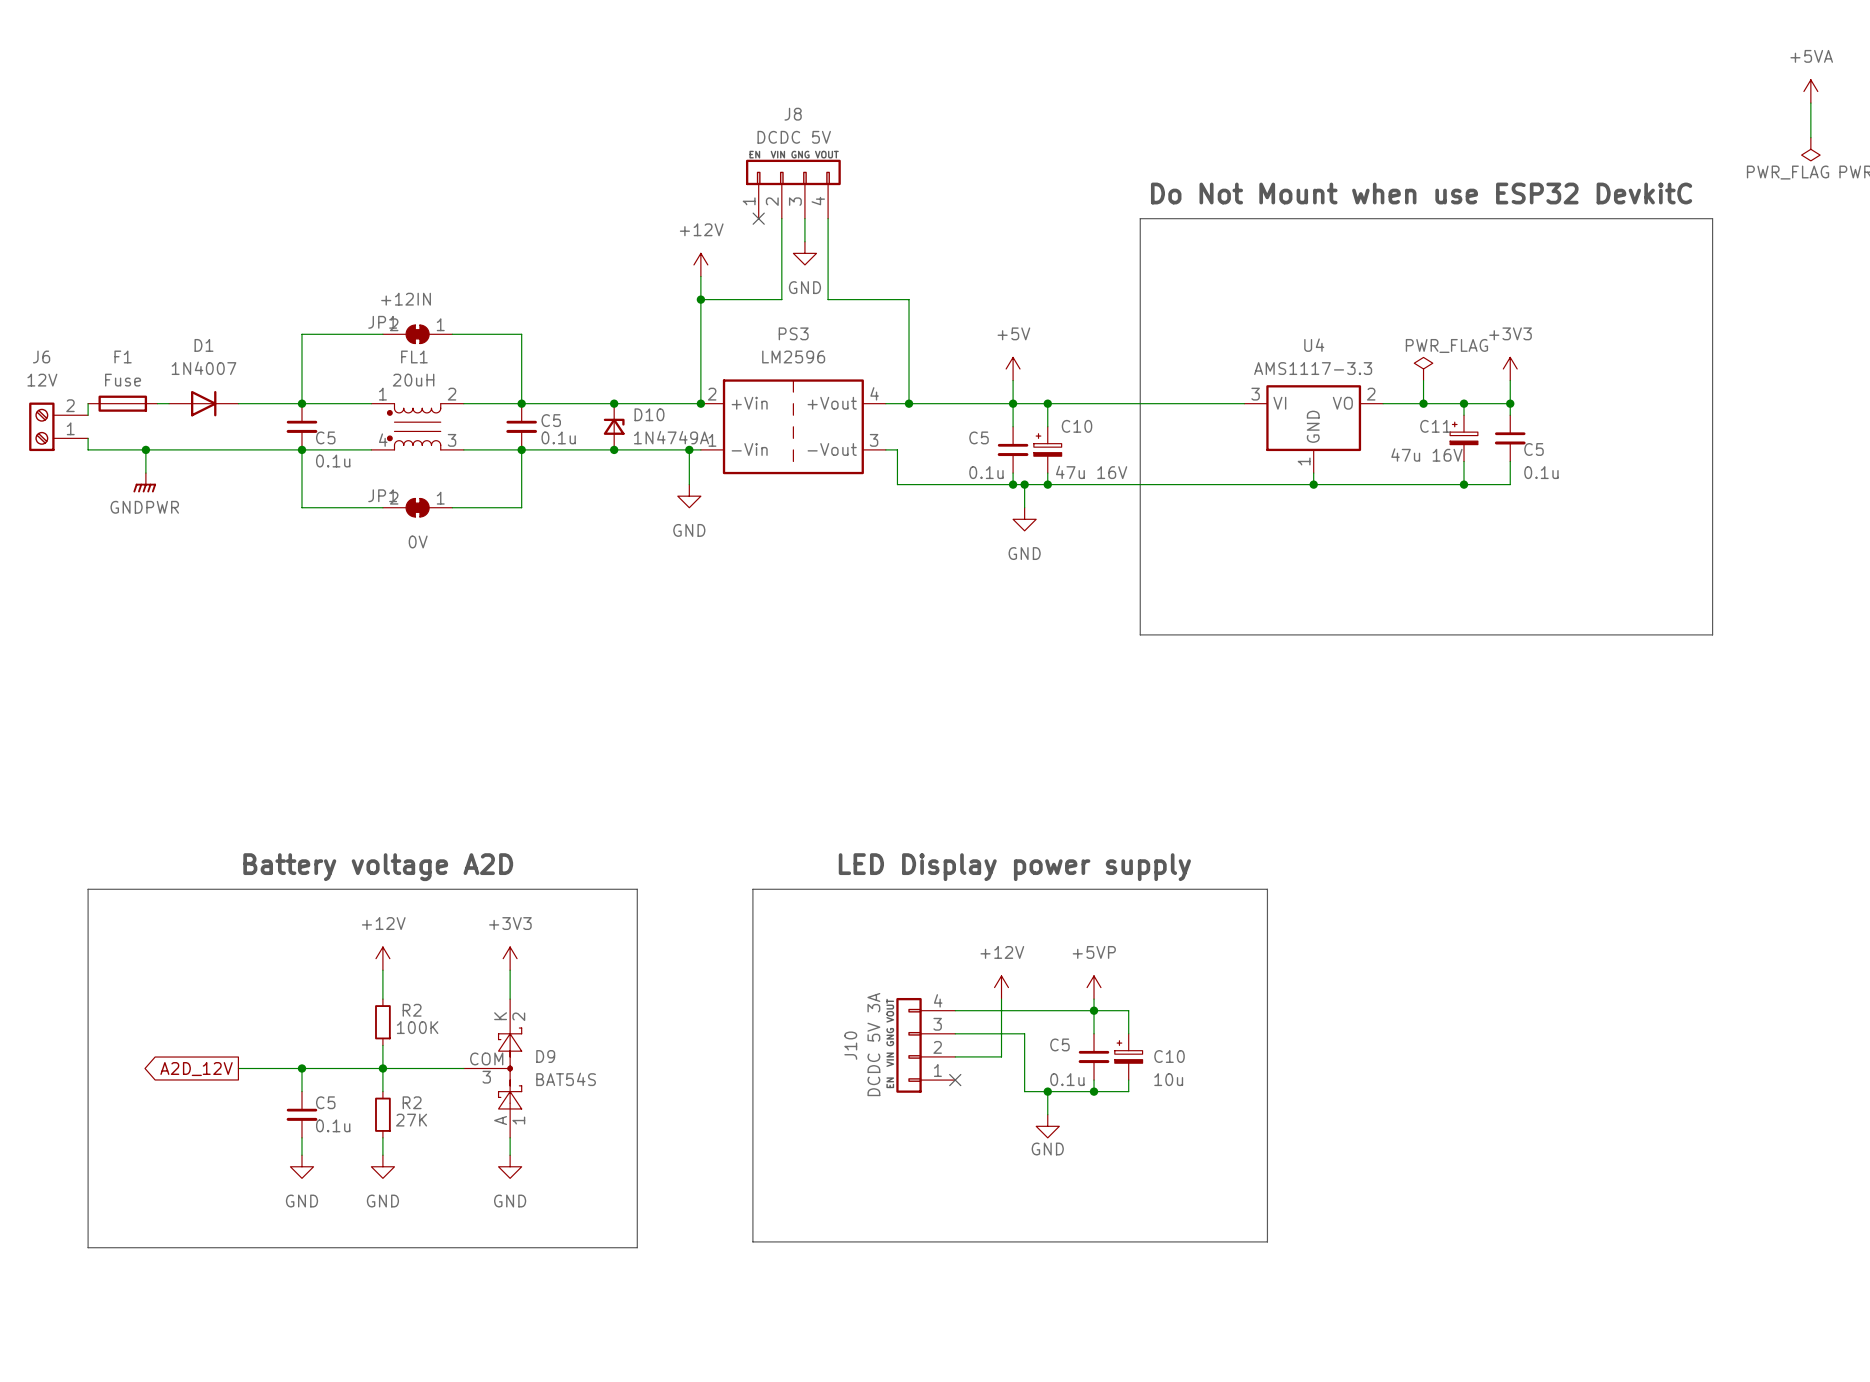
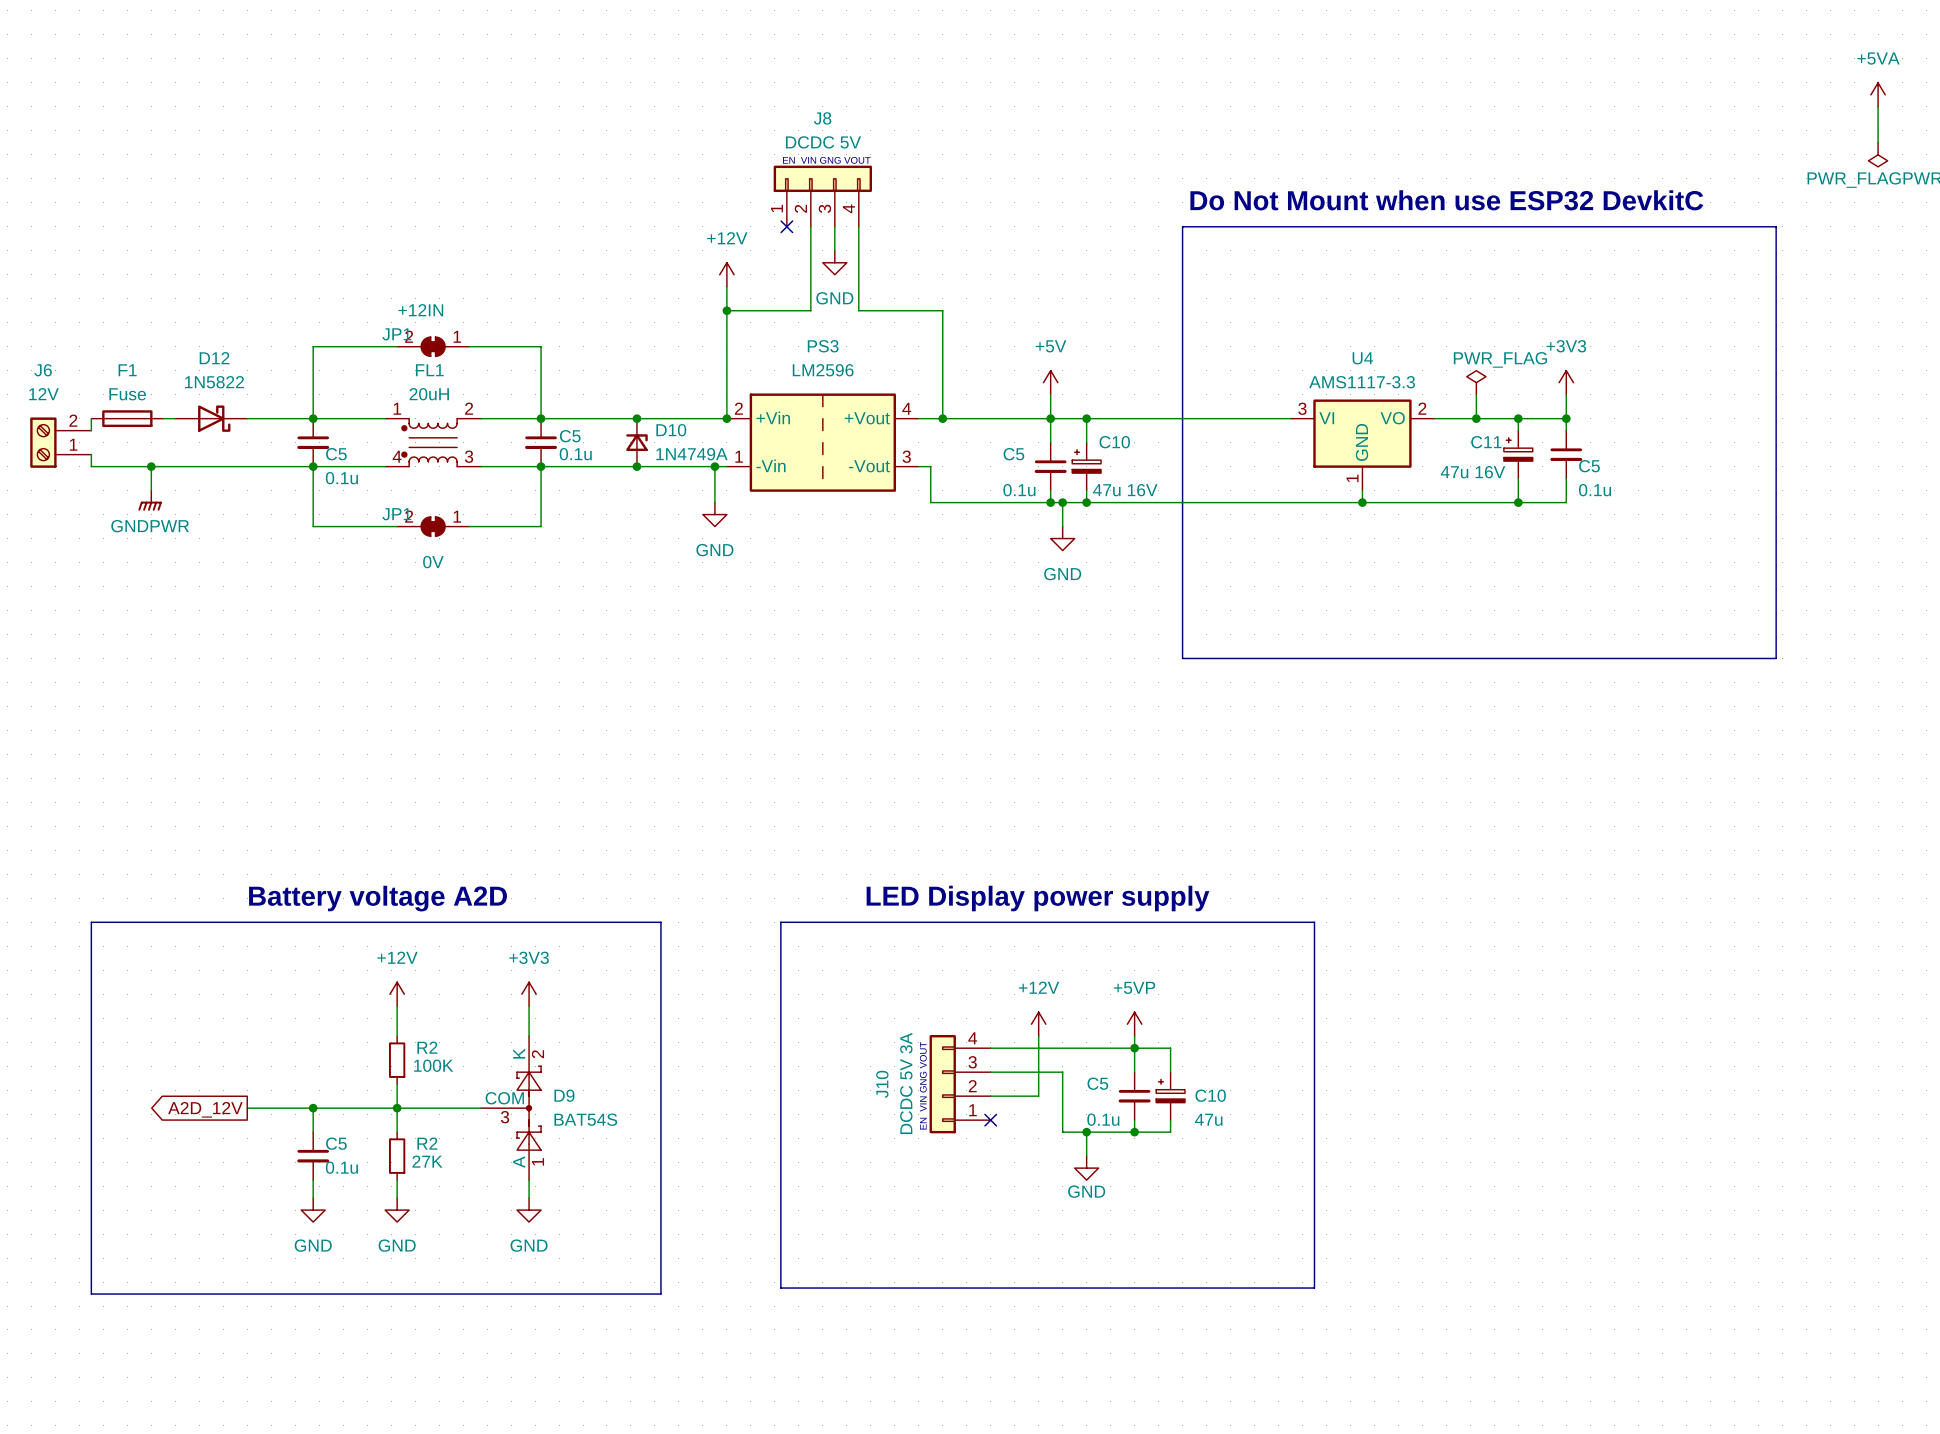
D1: 1N4007 (203, 403) -> none
D12: none -> 1N5822 (211, 418)
C10 value: 10u (1168, 1079) -> 47u (1208, 1119)

